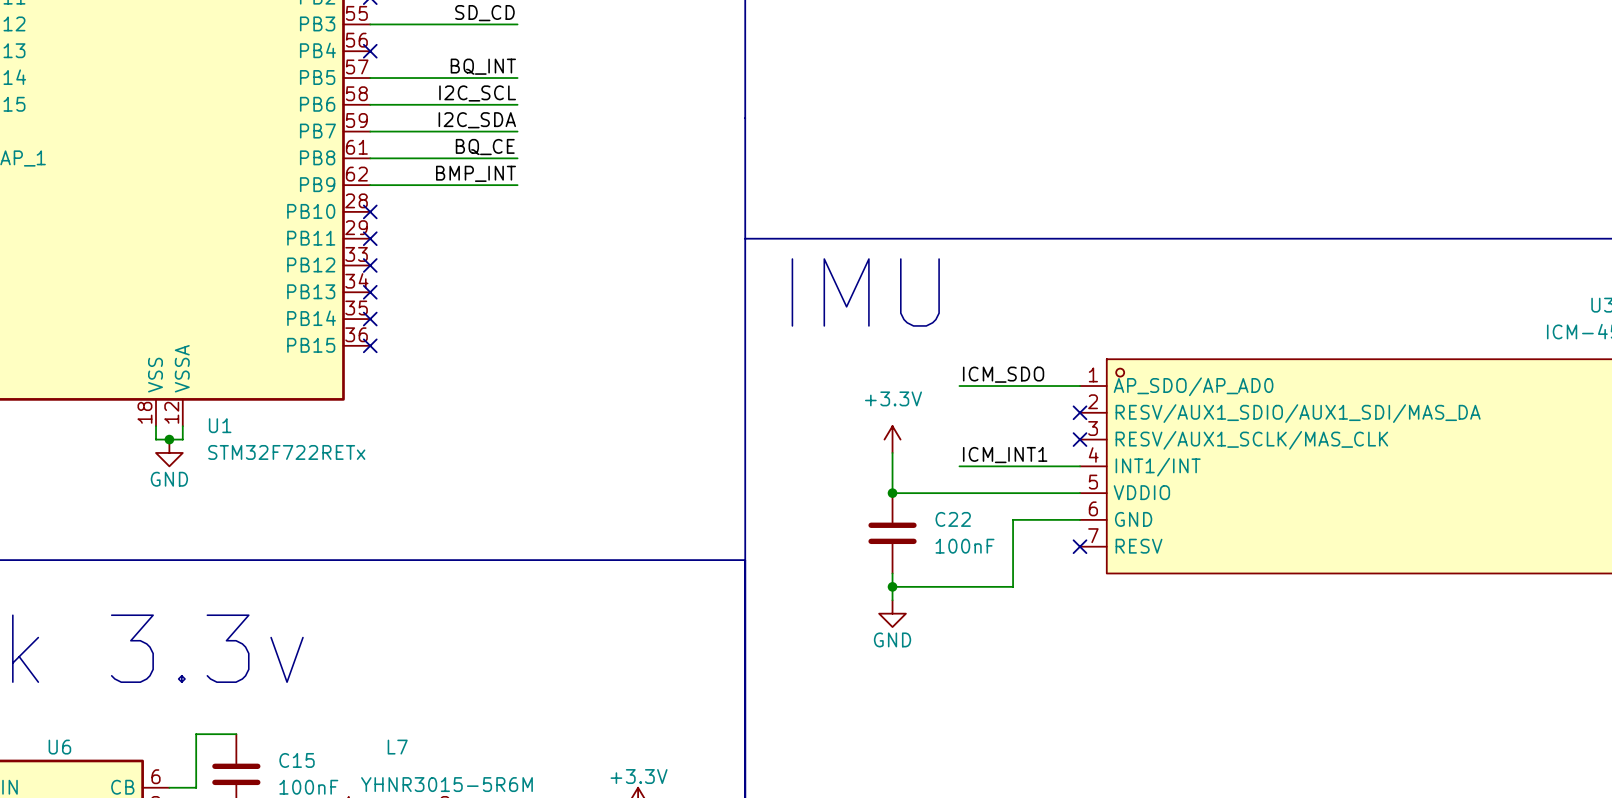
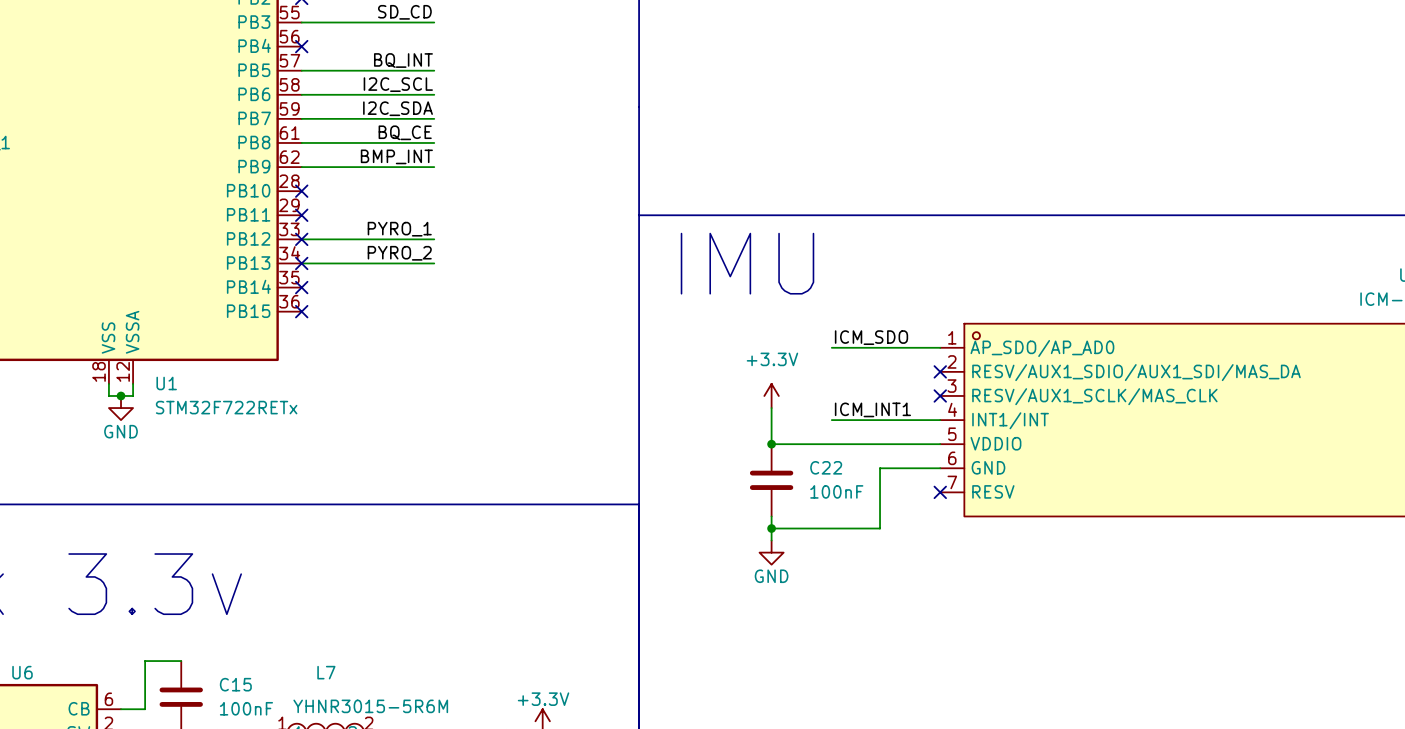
label: none -> PYRO_1 (399, 229)
wire: none -> (301, 239) (434, 239)
label: none -> PYRO_2 (399, 253)
wire: none -> (301, 263) (434, 263)

